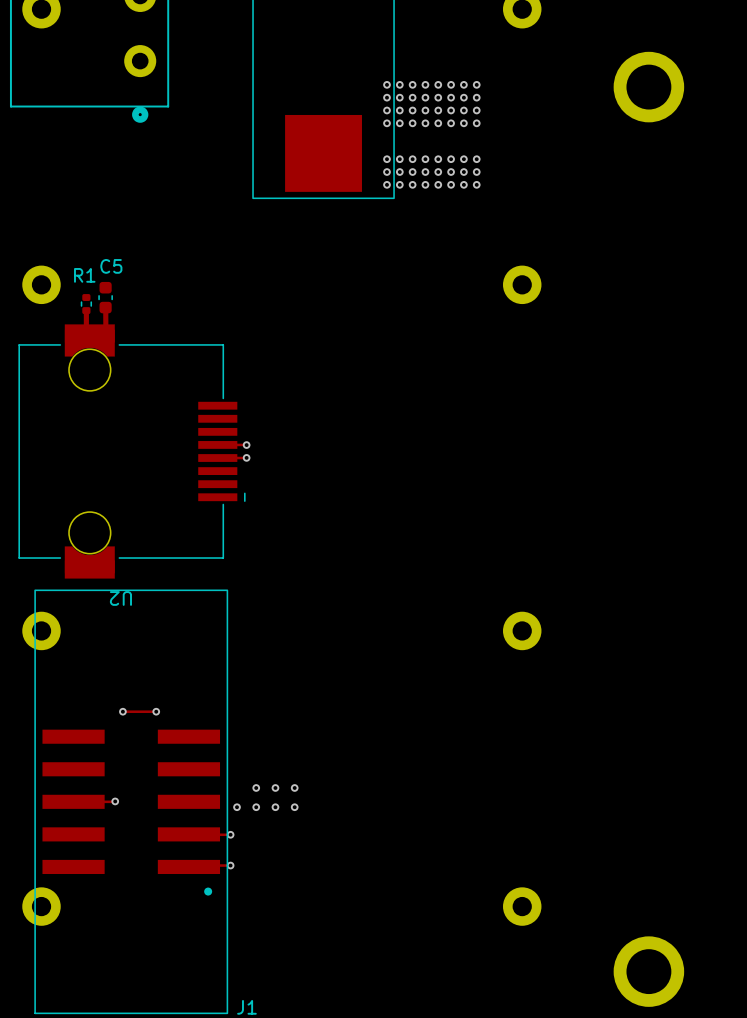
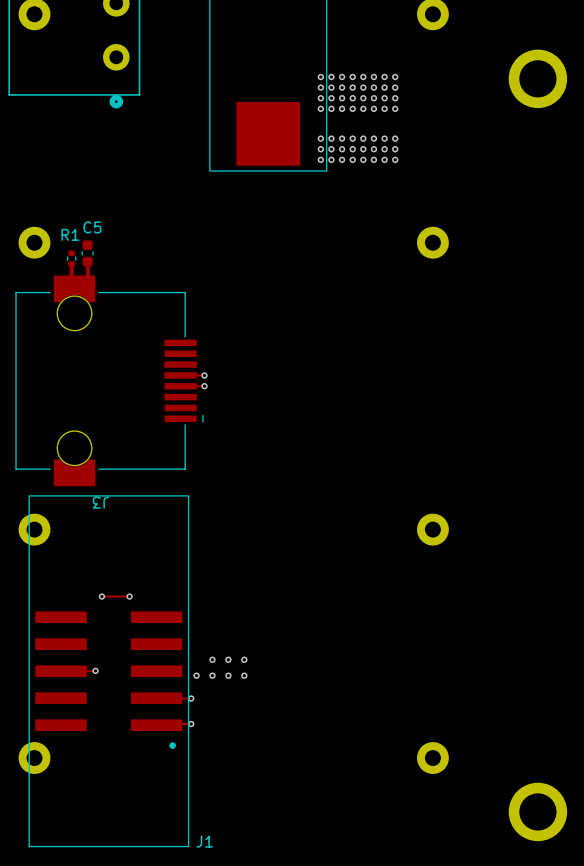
U2 name: U2 (120, 598) -> J3 (100, 502)

